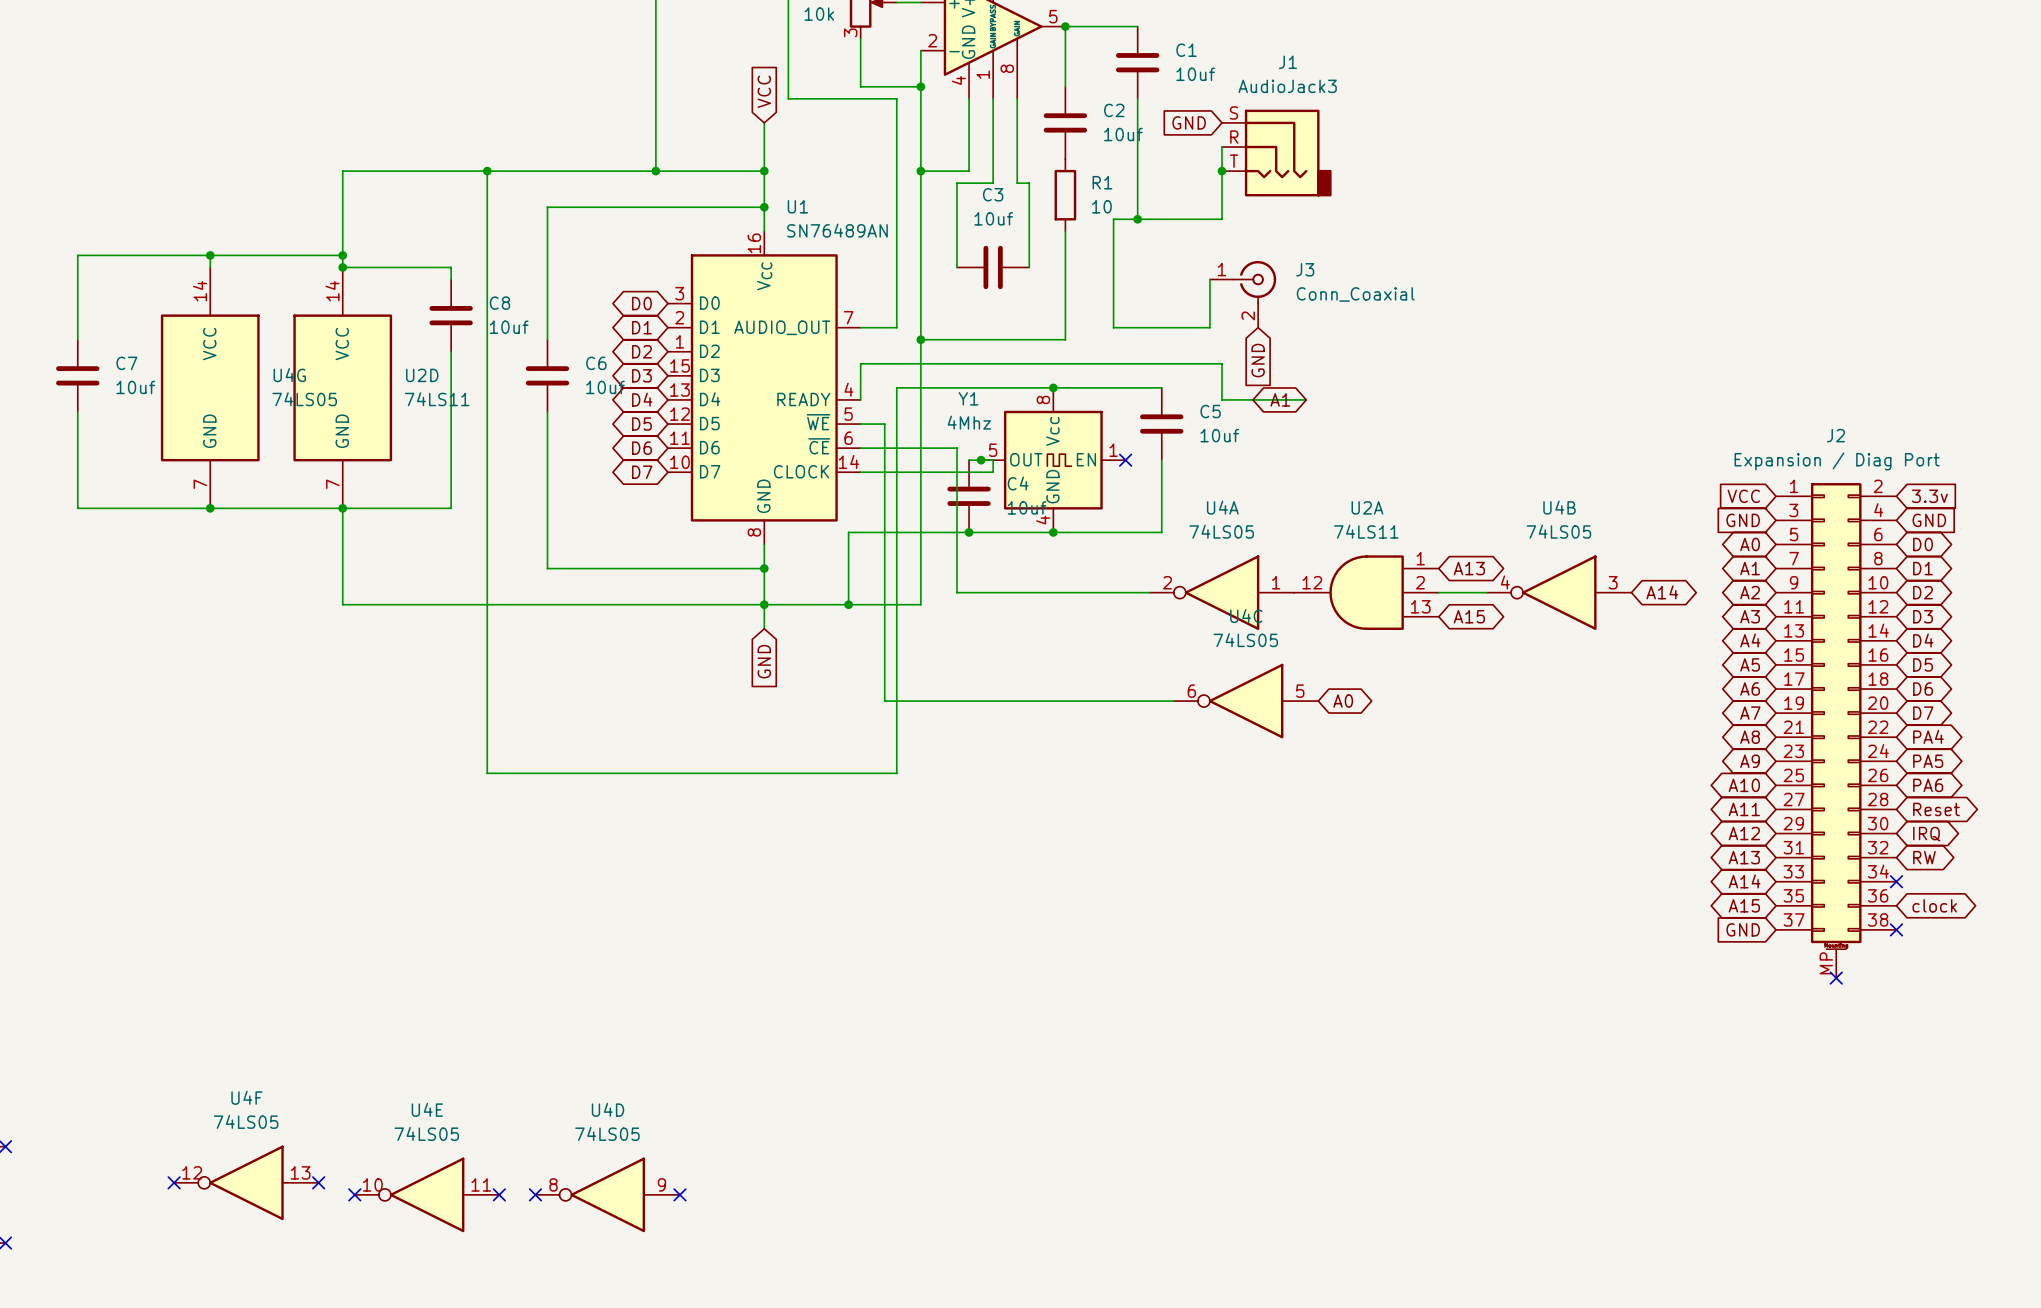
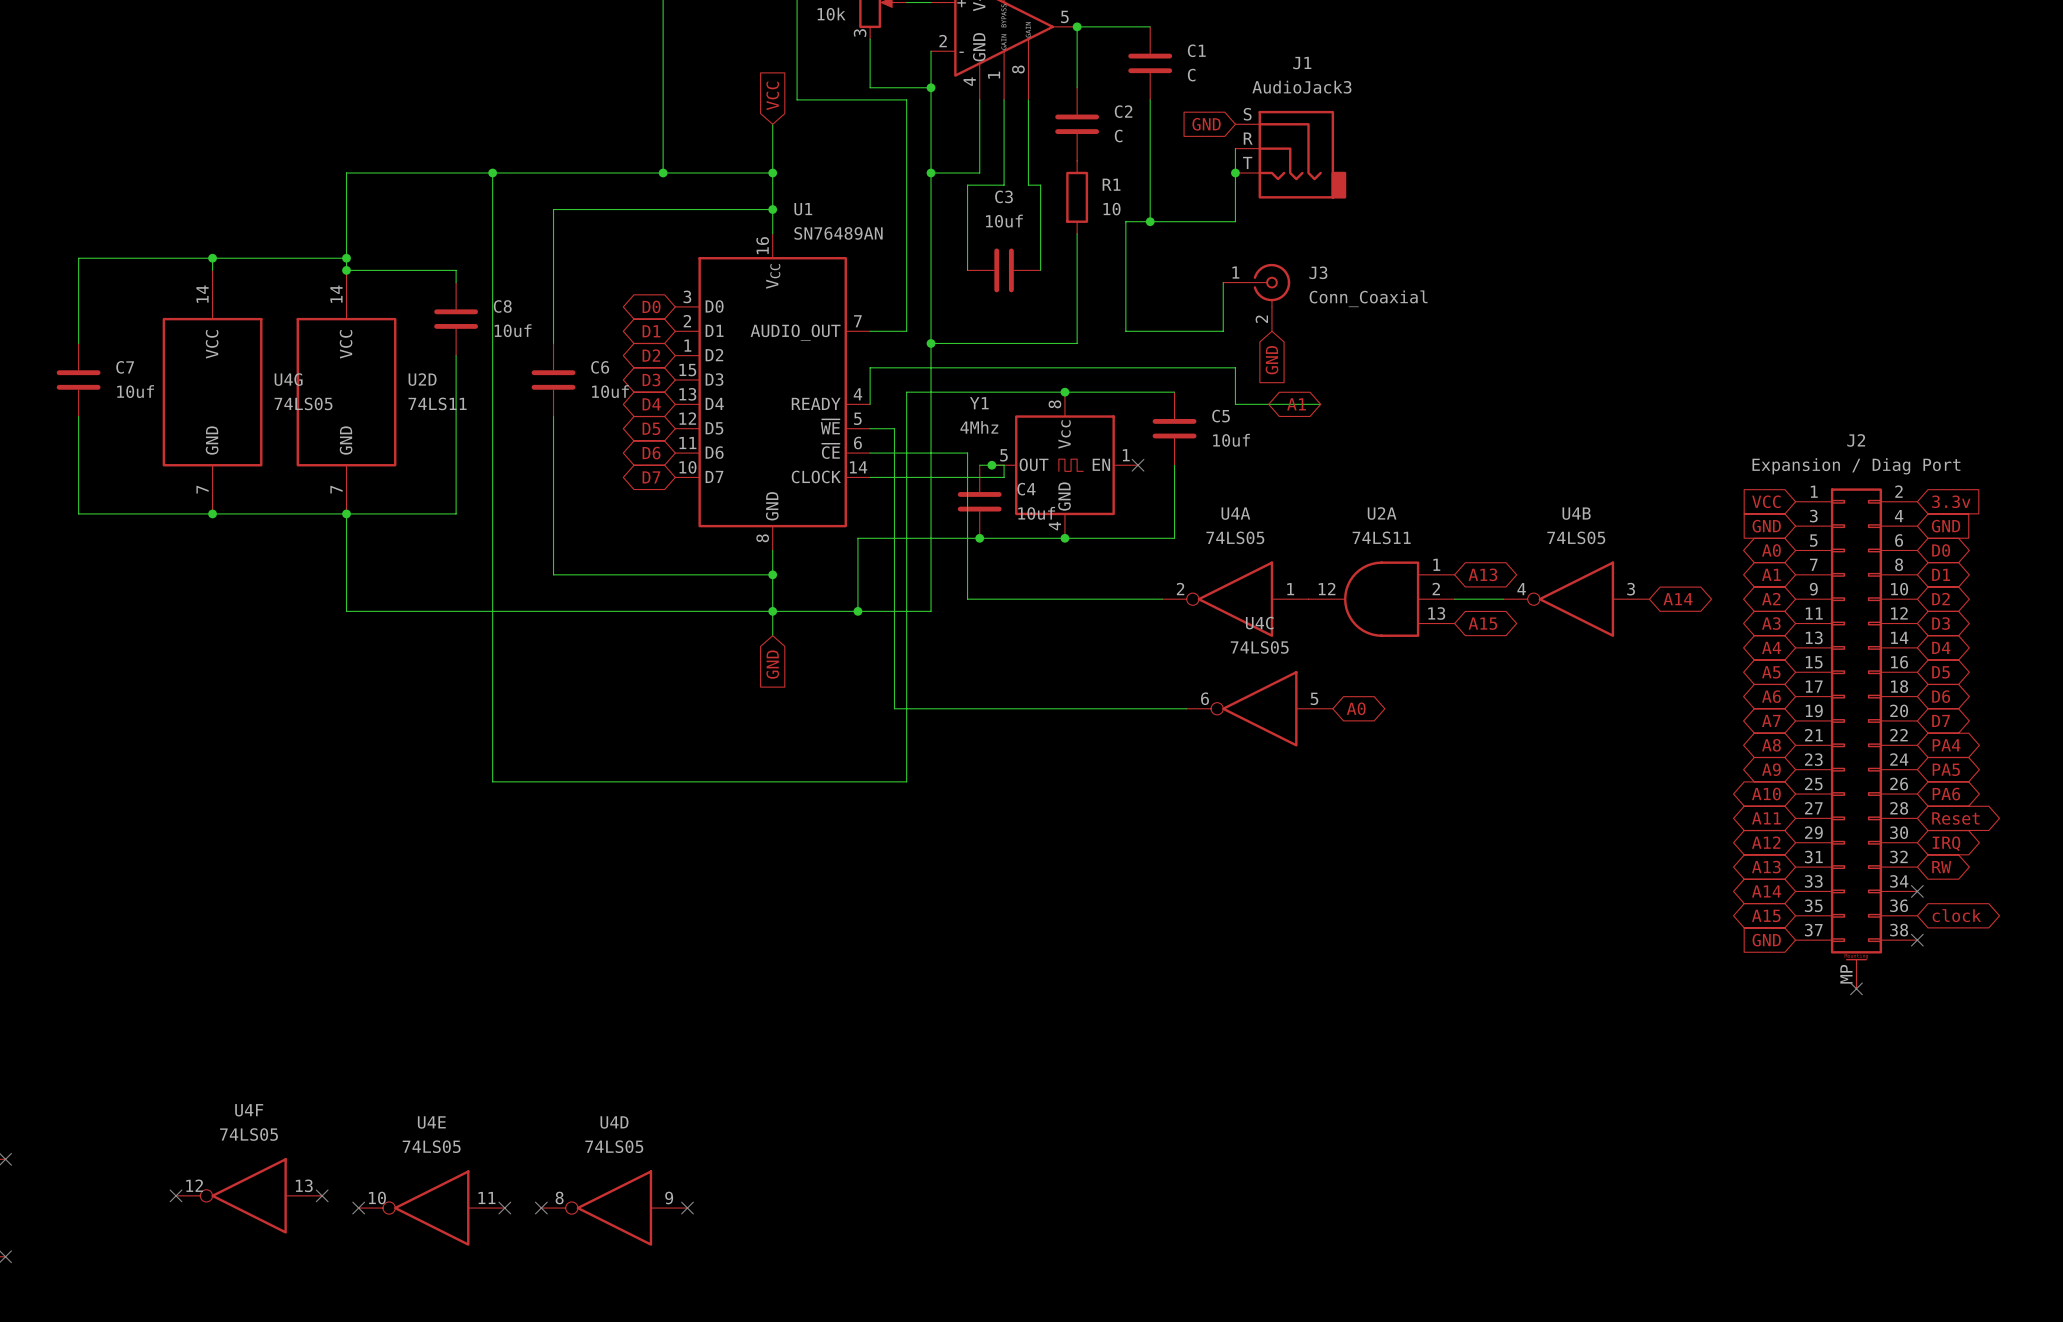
C1 value: 10uf (1195, 74) -> C (1191, 75)
C2 value: 10uf (1123, 134) -> C (1118, 136)

